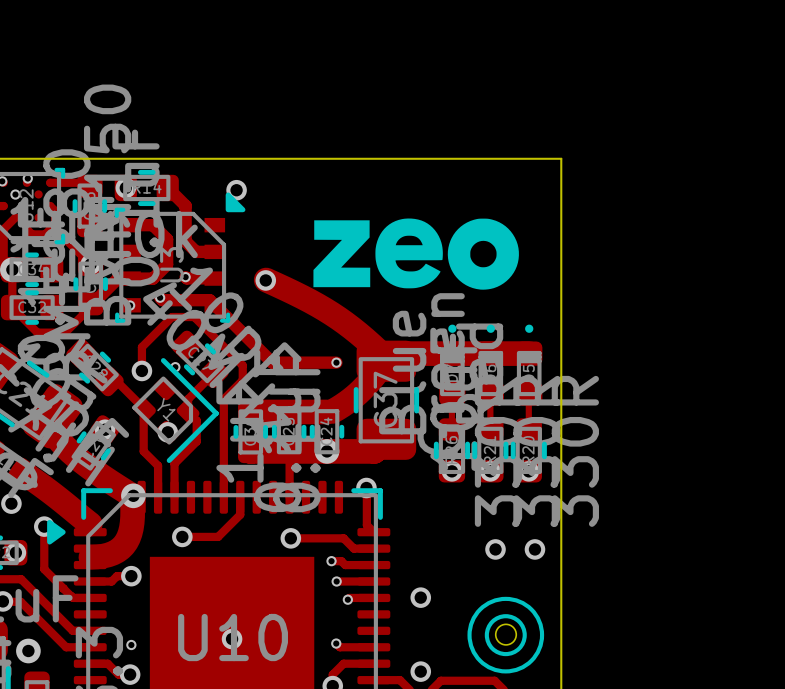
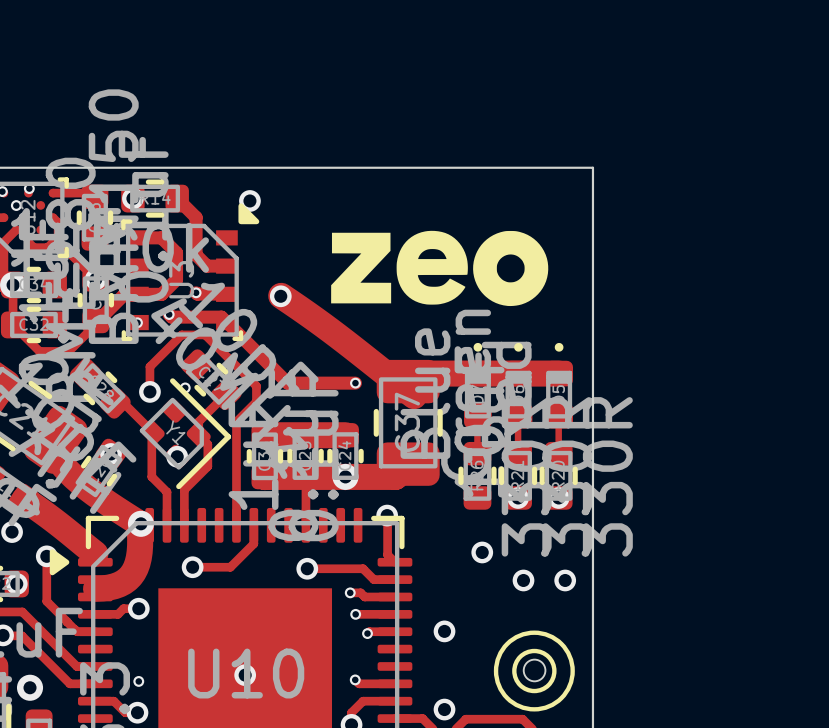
track: (266, 280) (331, 313) (358, 333) (387, 359) (361, 390) (333, 411) -> (281, 295) (337, 336) (414, 396)
via position: (451, 471) -> (482, 552)

